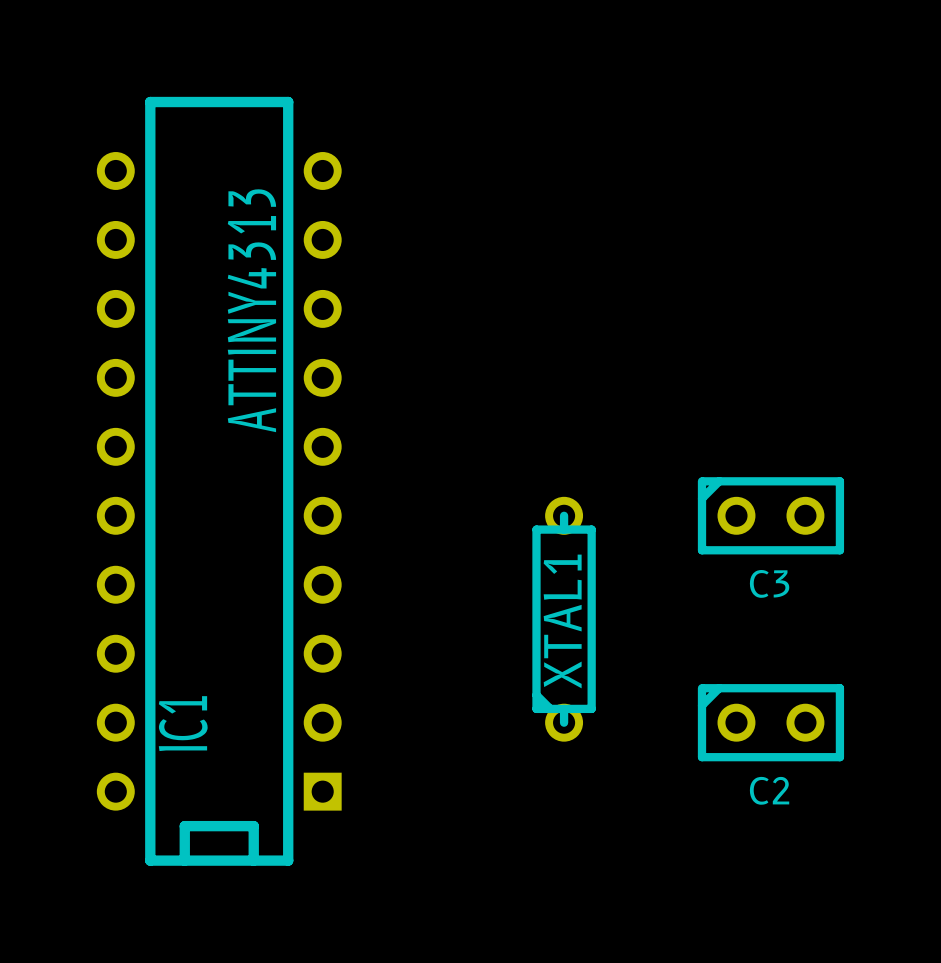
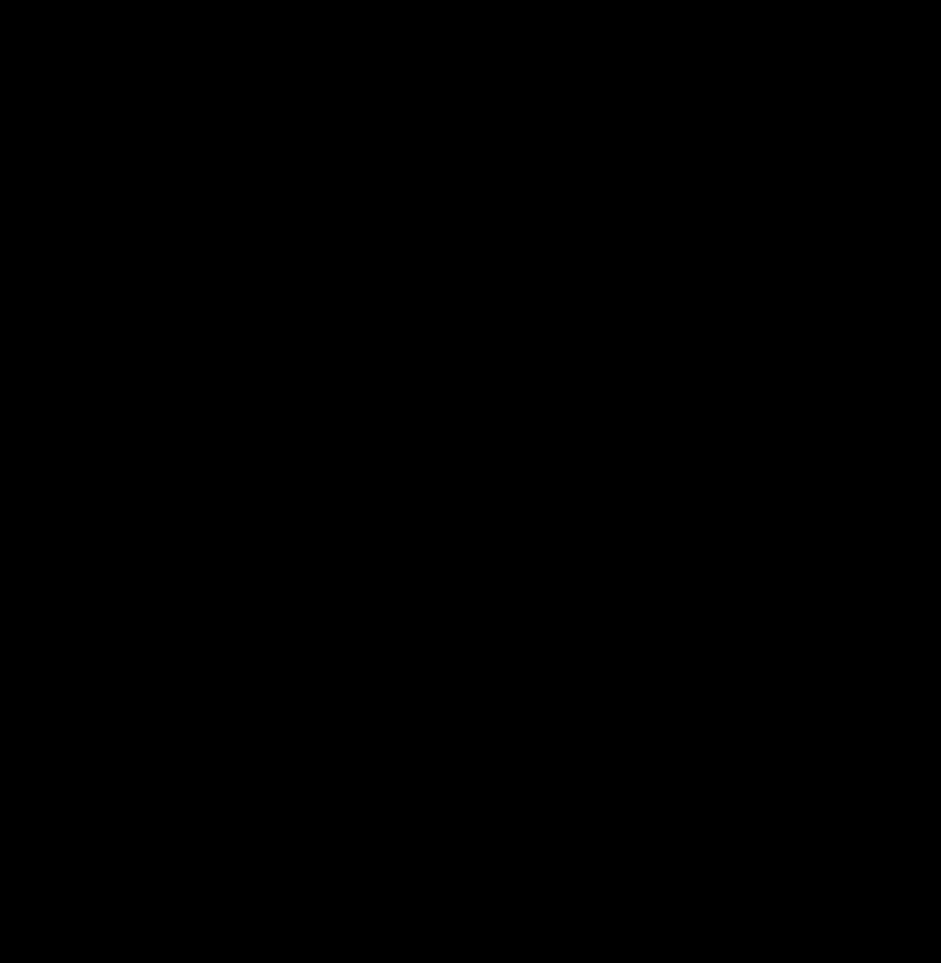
IC1: ATTINY4313 (219, 481) -> none
C3: (770, 515) -> none
XTAL1: (564, 619) -> none
C2: (770, 722) -> none

